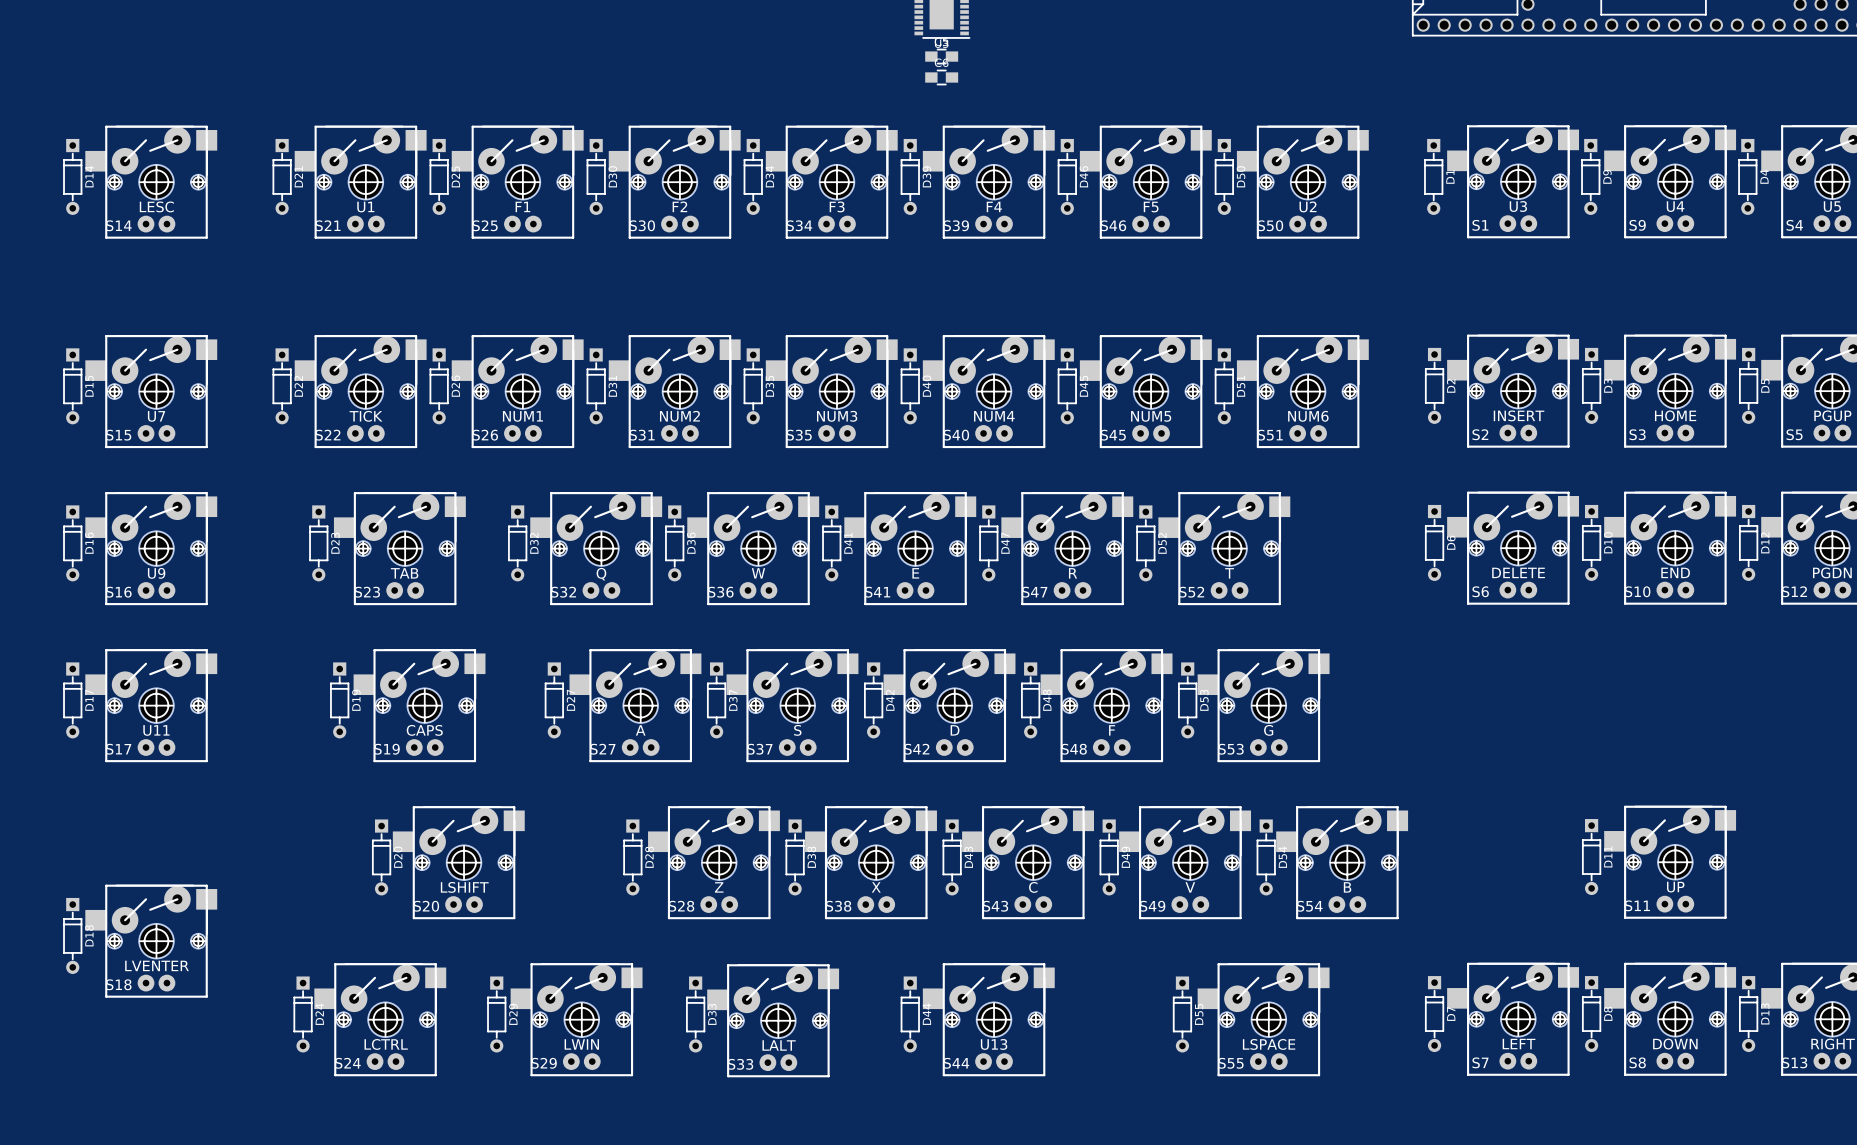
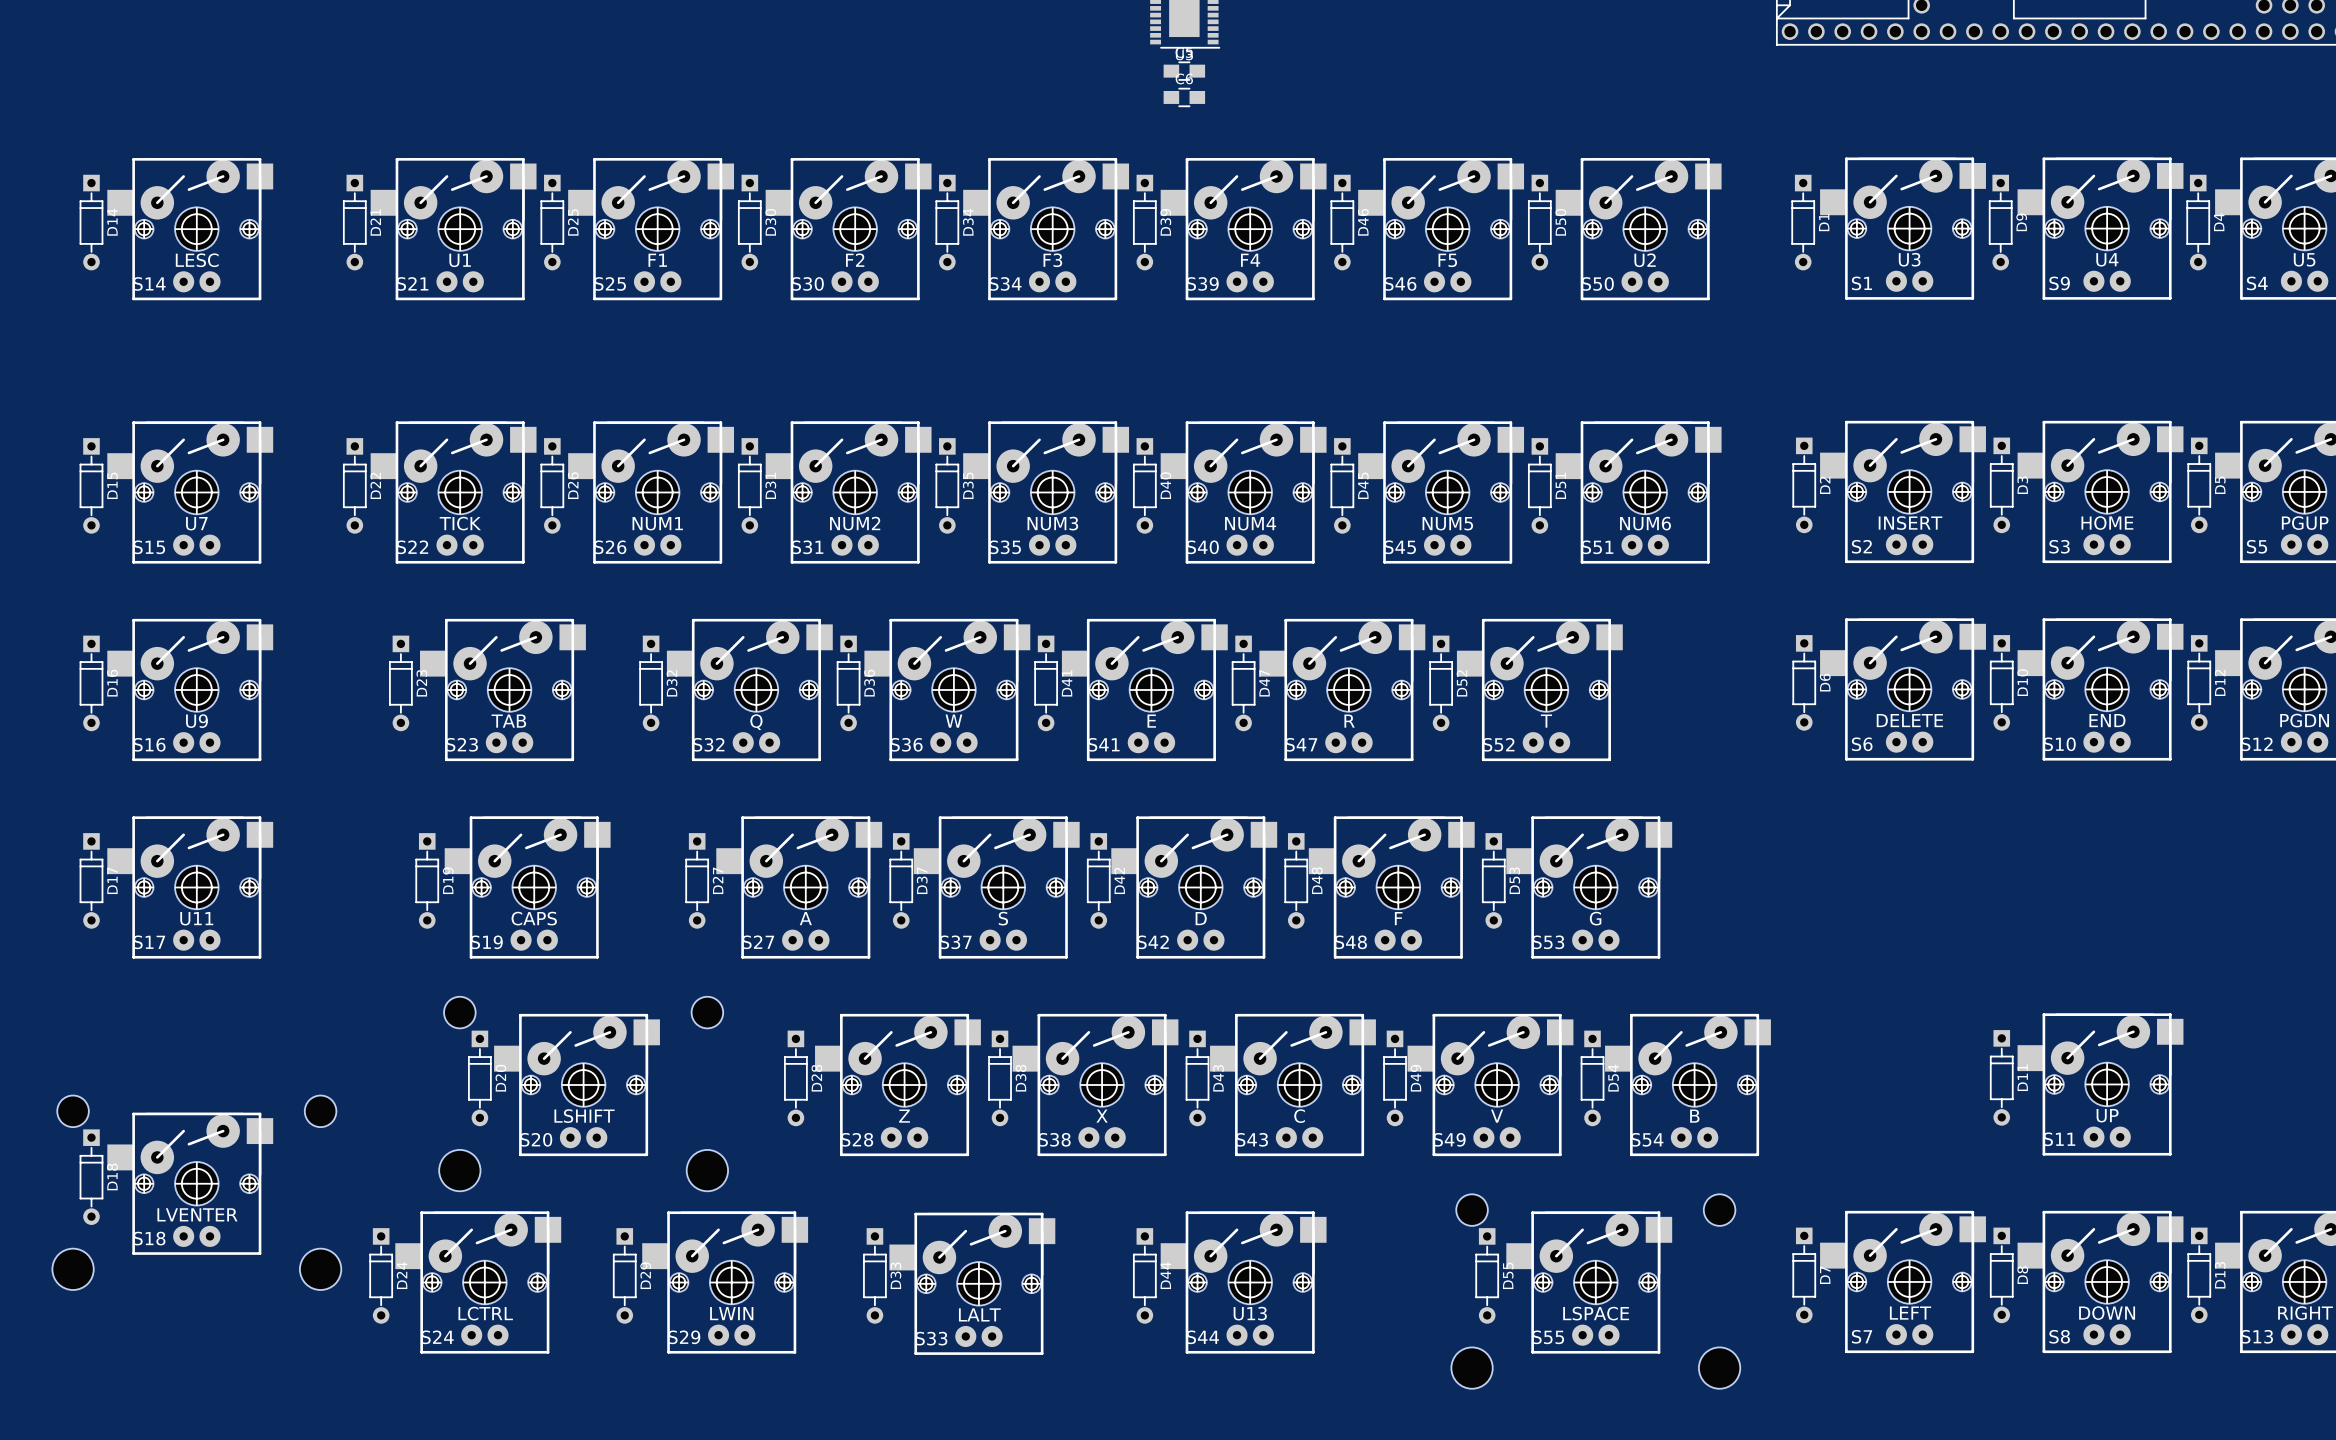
S20 footprint: [392, 806, 525, 920] -> [439, 996, 729, 1192]
S18 footprint: [85, 884, 218, 998] -> [52, 1095, 342, 1291]
S55 footprint: [1197, 963, 1330, 1077] -> [1451, 1194, 1741, 1389]

